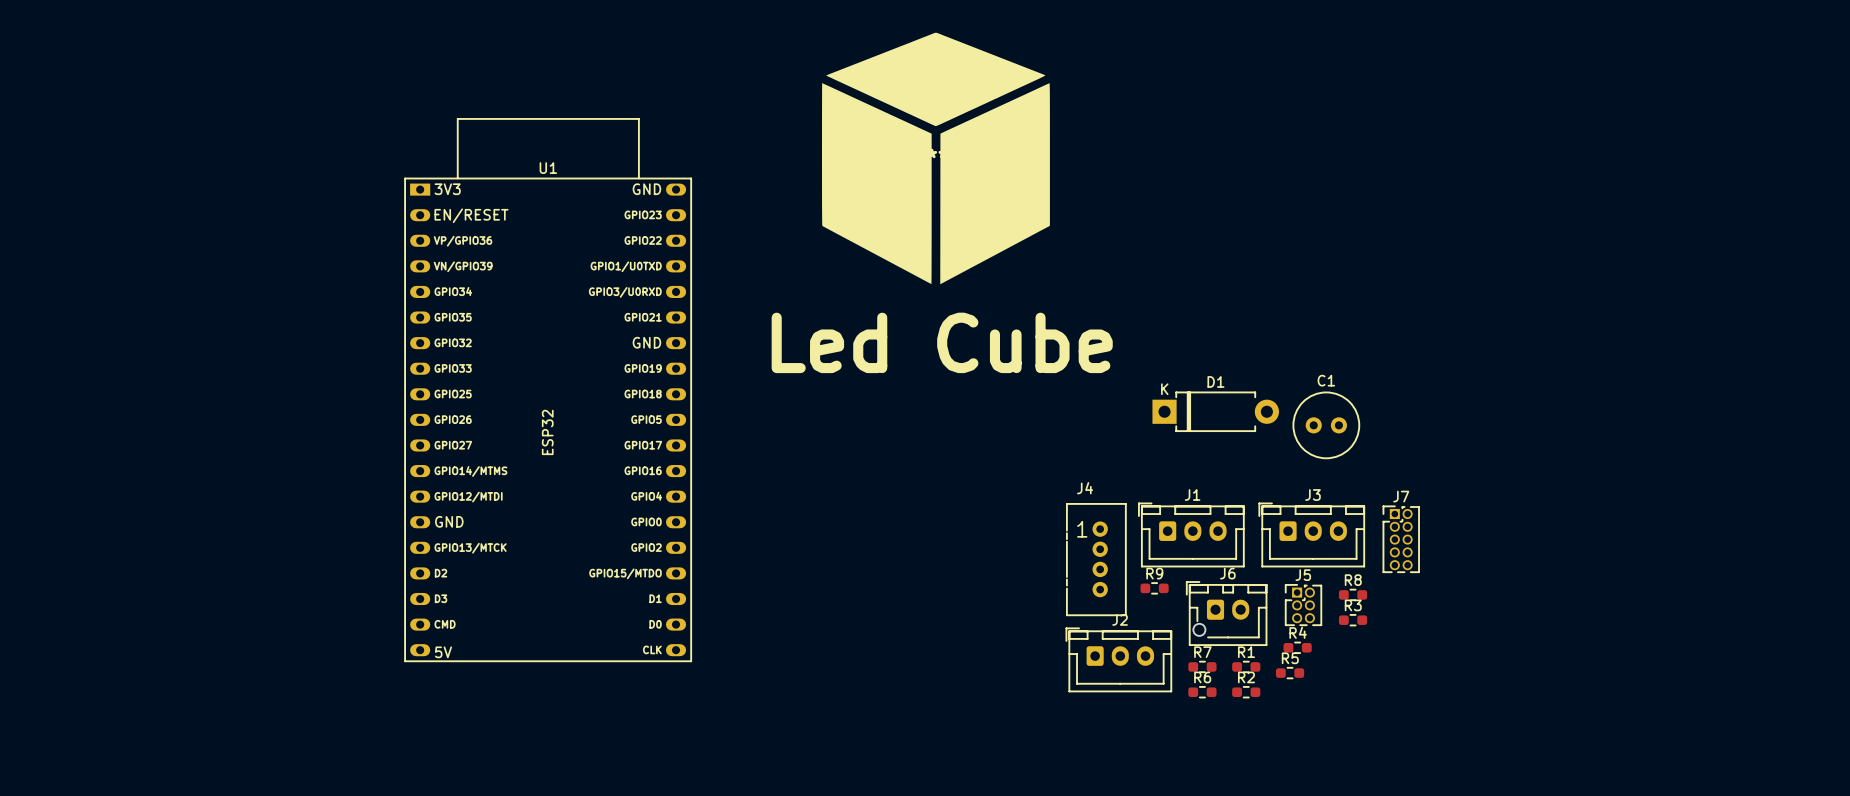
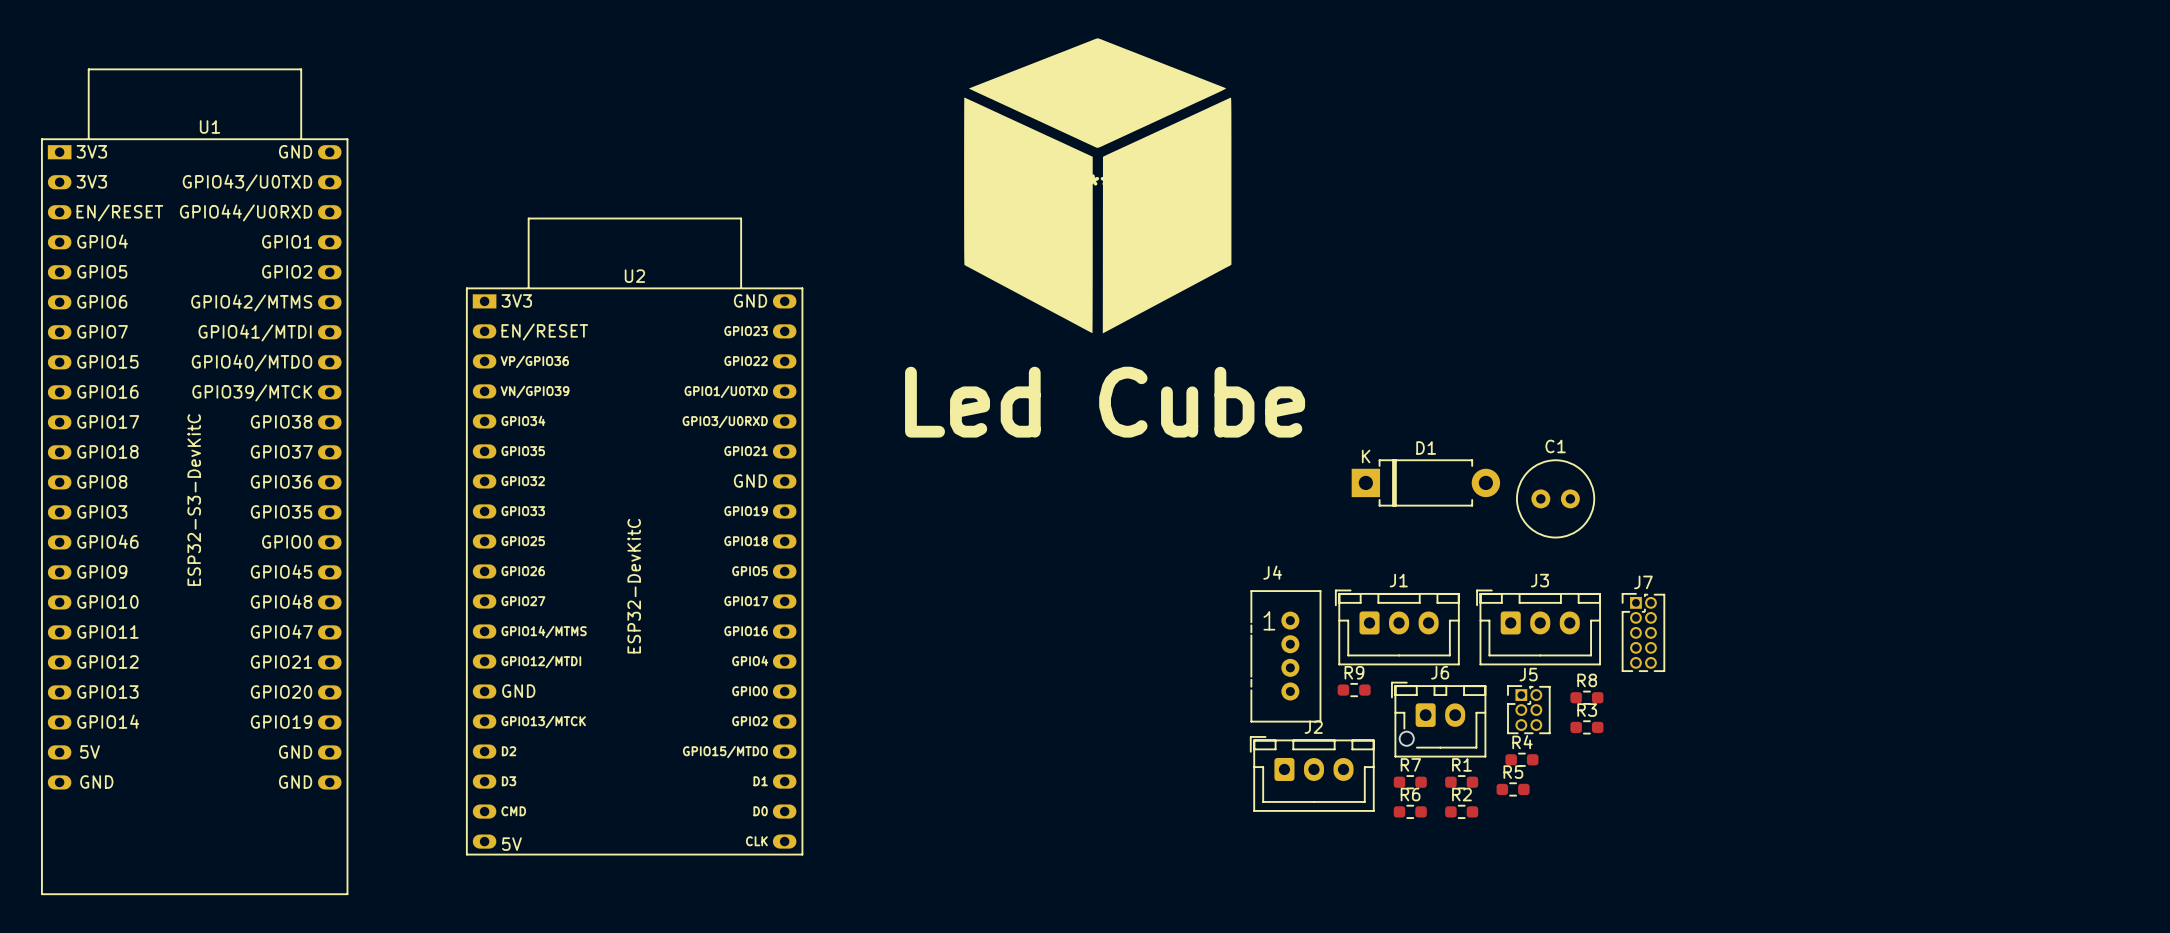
U1 footprint: [404, 118, 692, 662] -> [41, 68, 349, 895]
U1 name position: U1 (548, 168) -> U1 (209, 126)
U1 value: ESP32 (547, 432) -> ESP32-S3-DevKitC (194, 500)
U2: none -> ESP32-DevKitC (634, 536)

